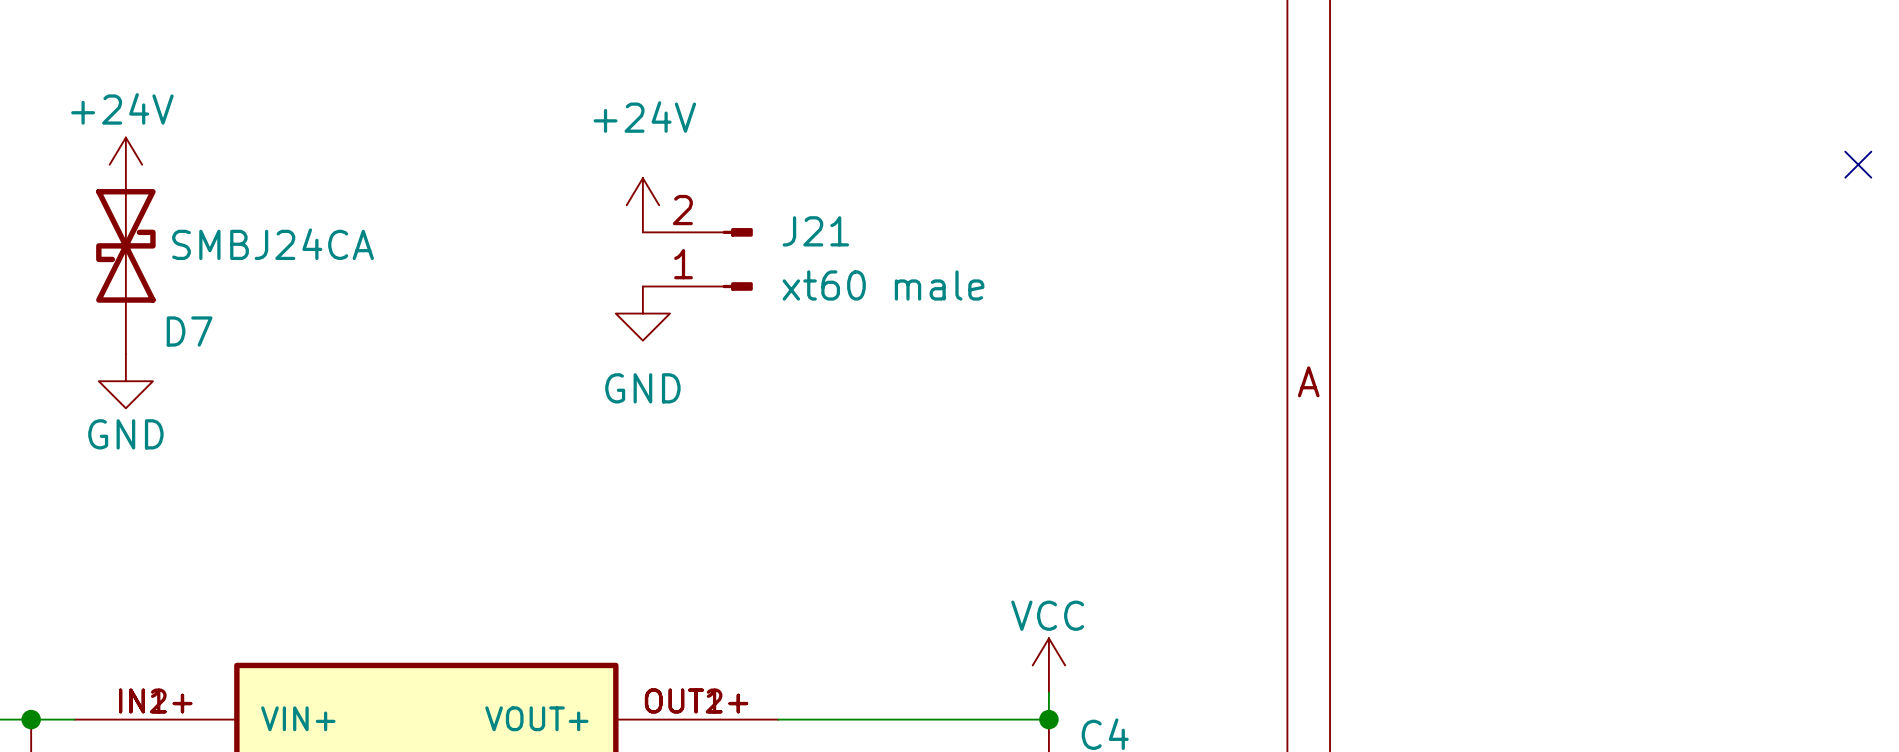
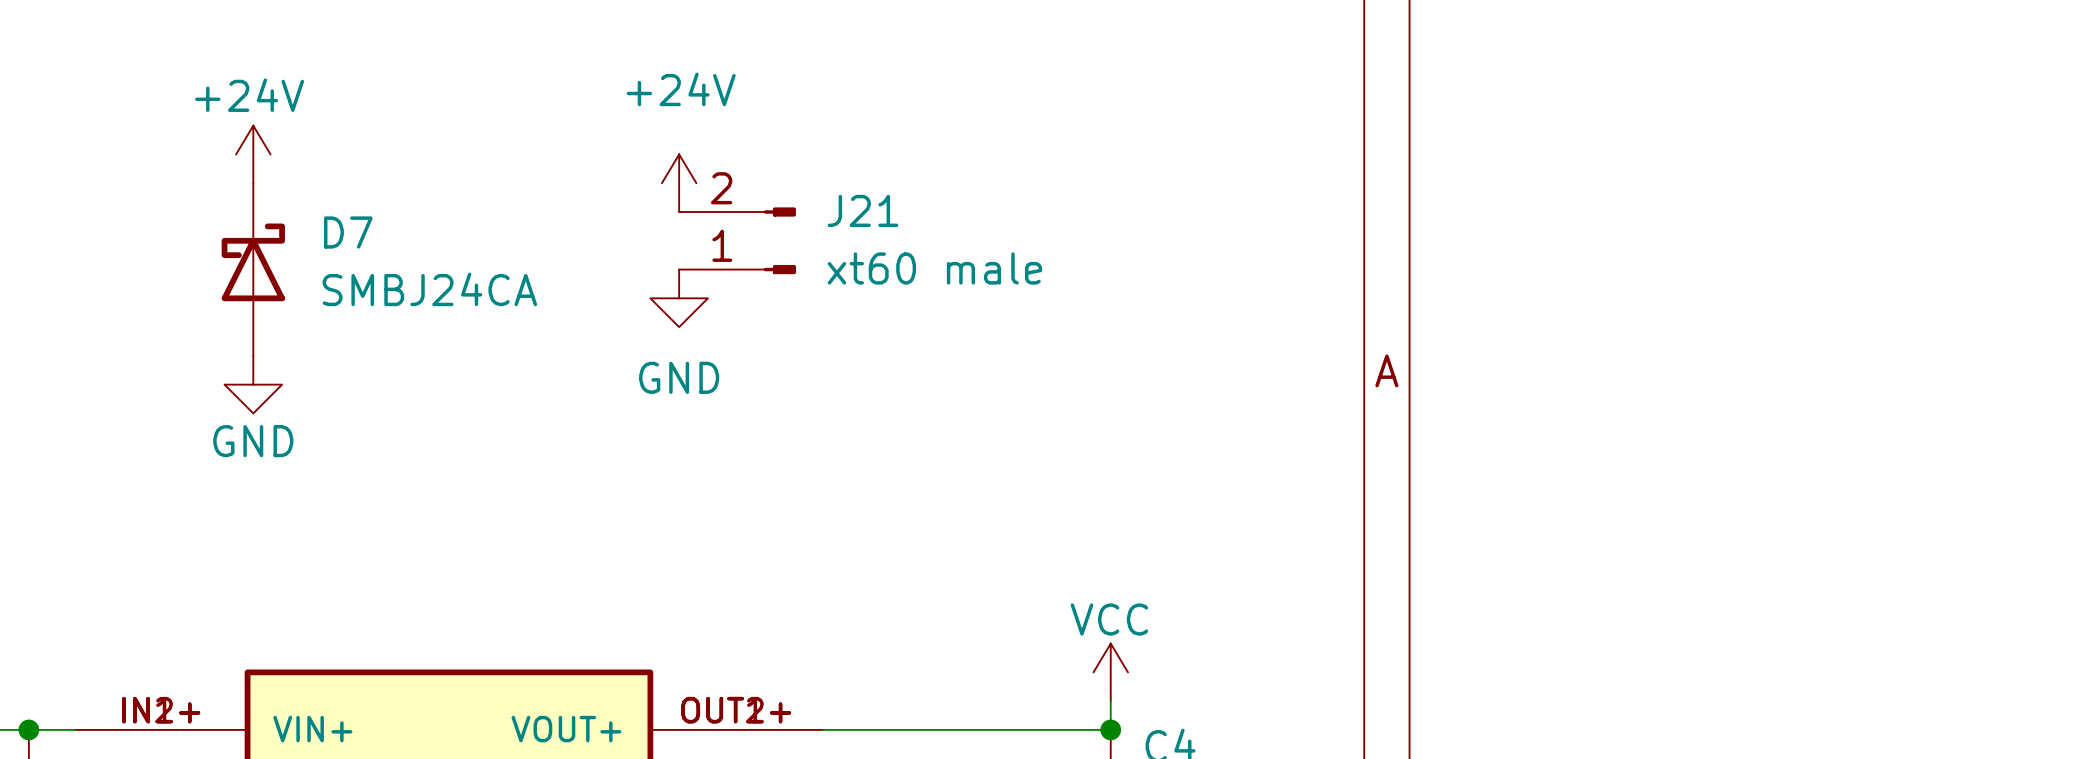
power symbol position: +24V (125, 164) -> +24V (253, 154)
no-connect mark: (1858, 164) -> none
D7 symbol: [96, 189, 156, 355] -> [221, 183, 285, 356]
D7 value position: SMBJ24CA (273, 244) -> SMBJ24CA (429, 289)
D7 name position: D7 (189, 331) -> D7 (348, 232)
power symbol position: GND (125, 381) -> GND (253, 384)

